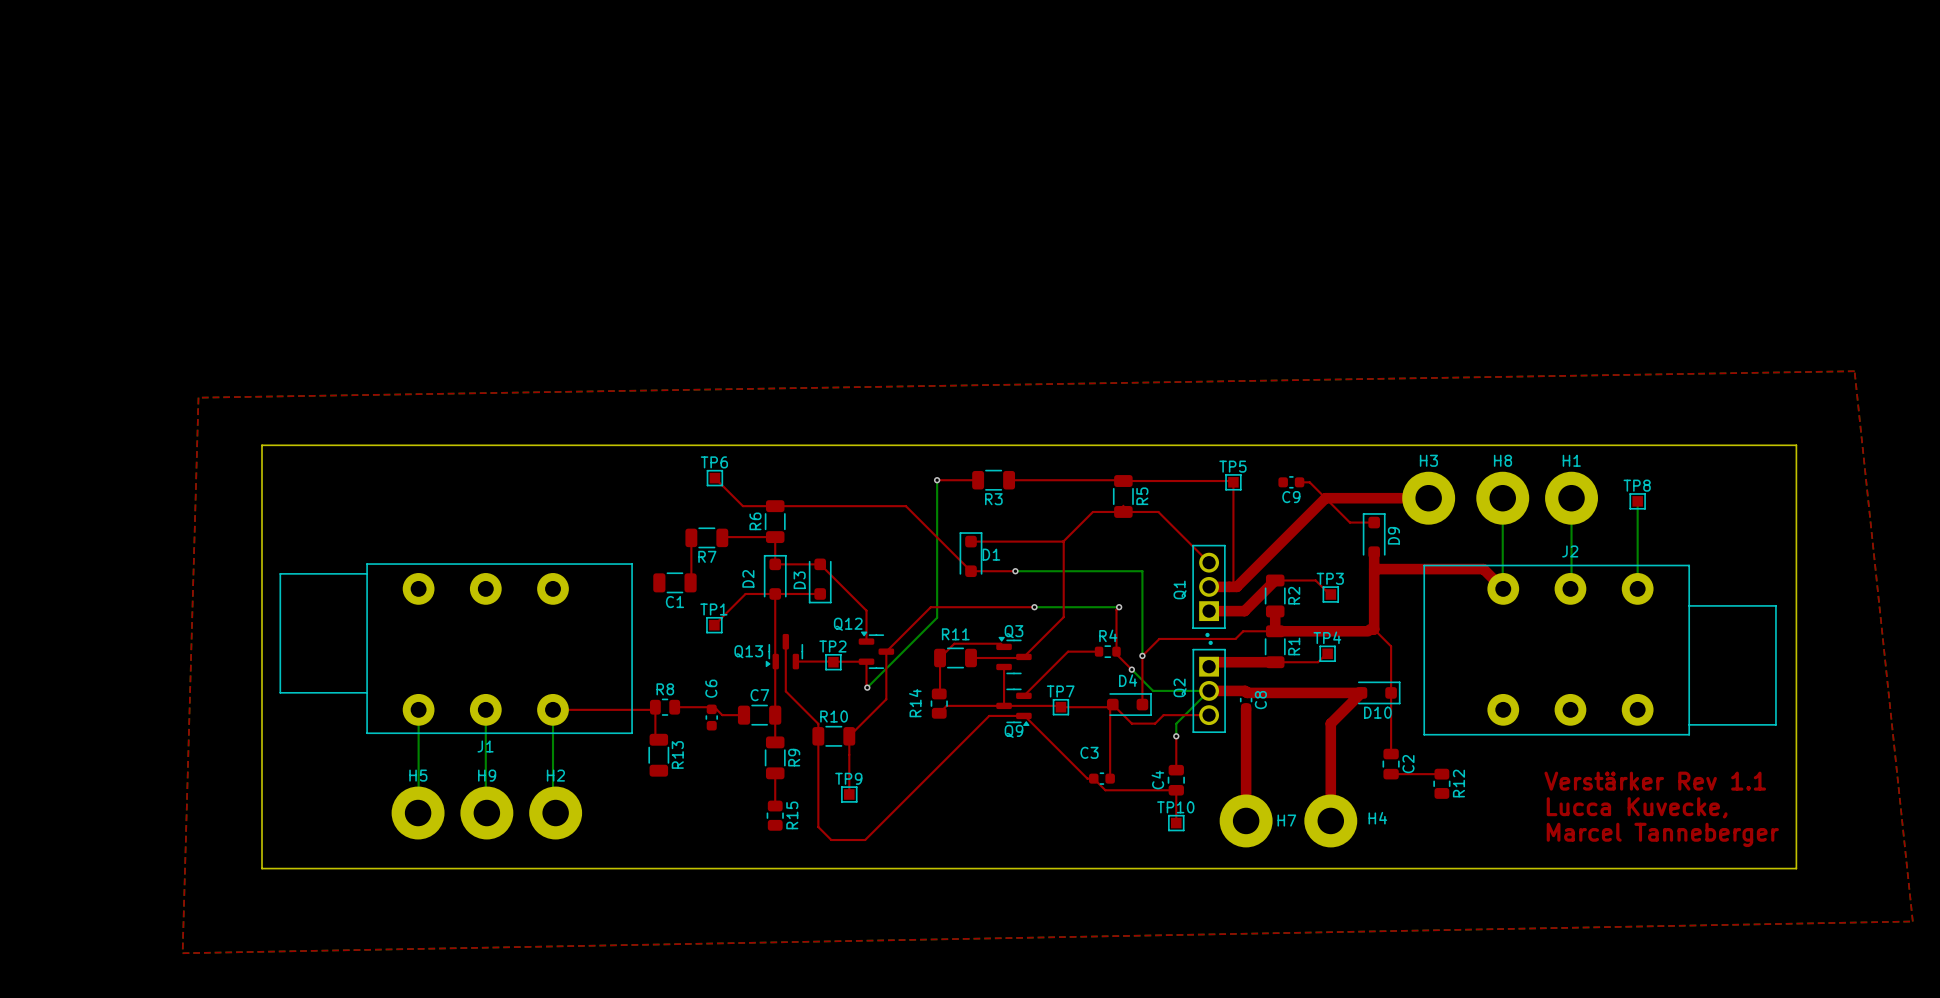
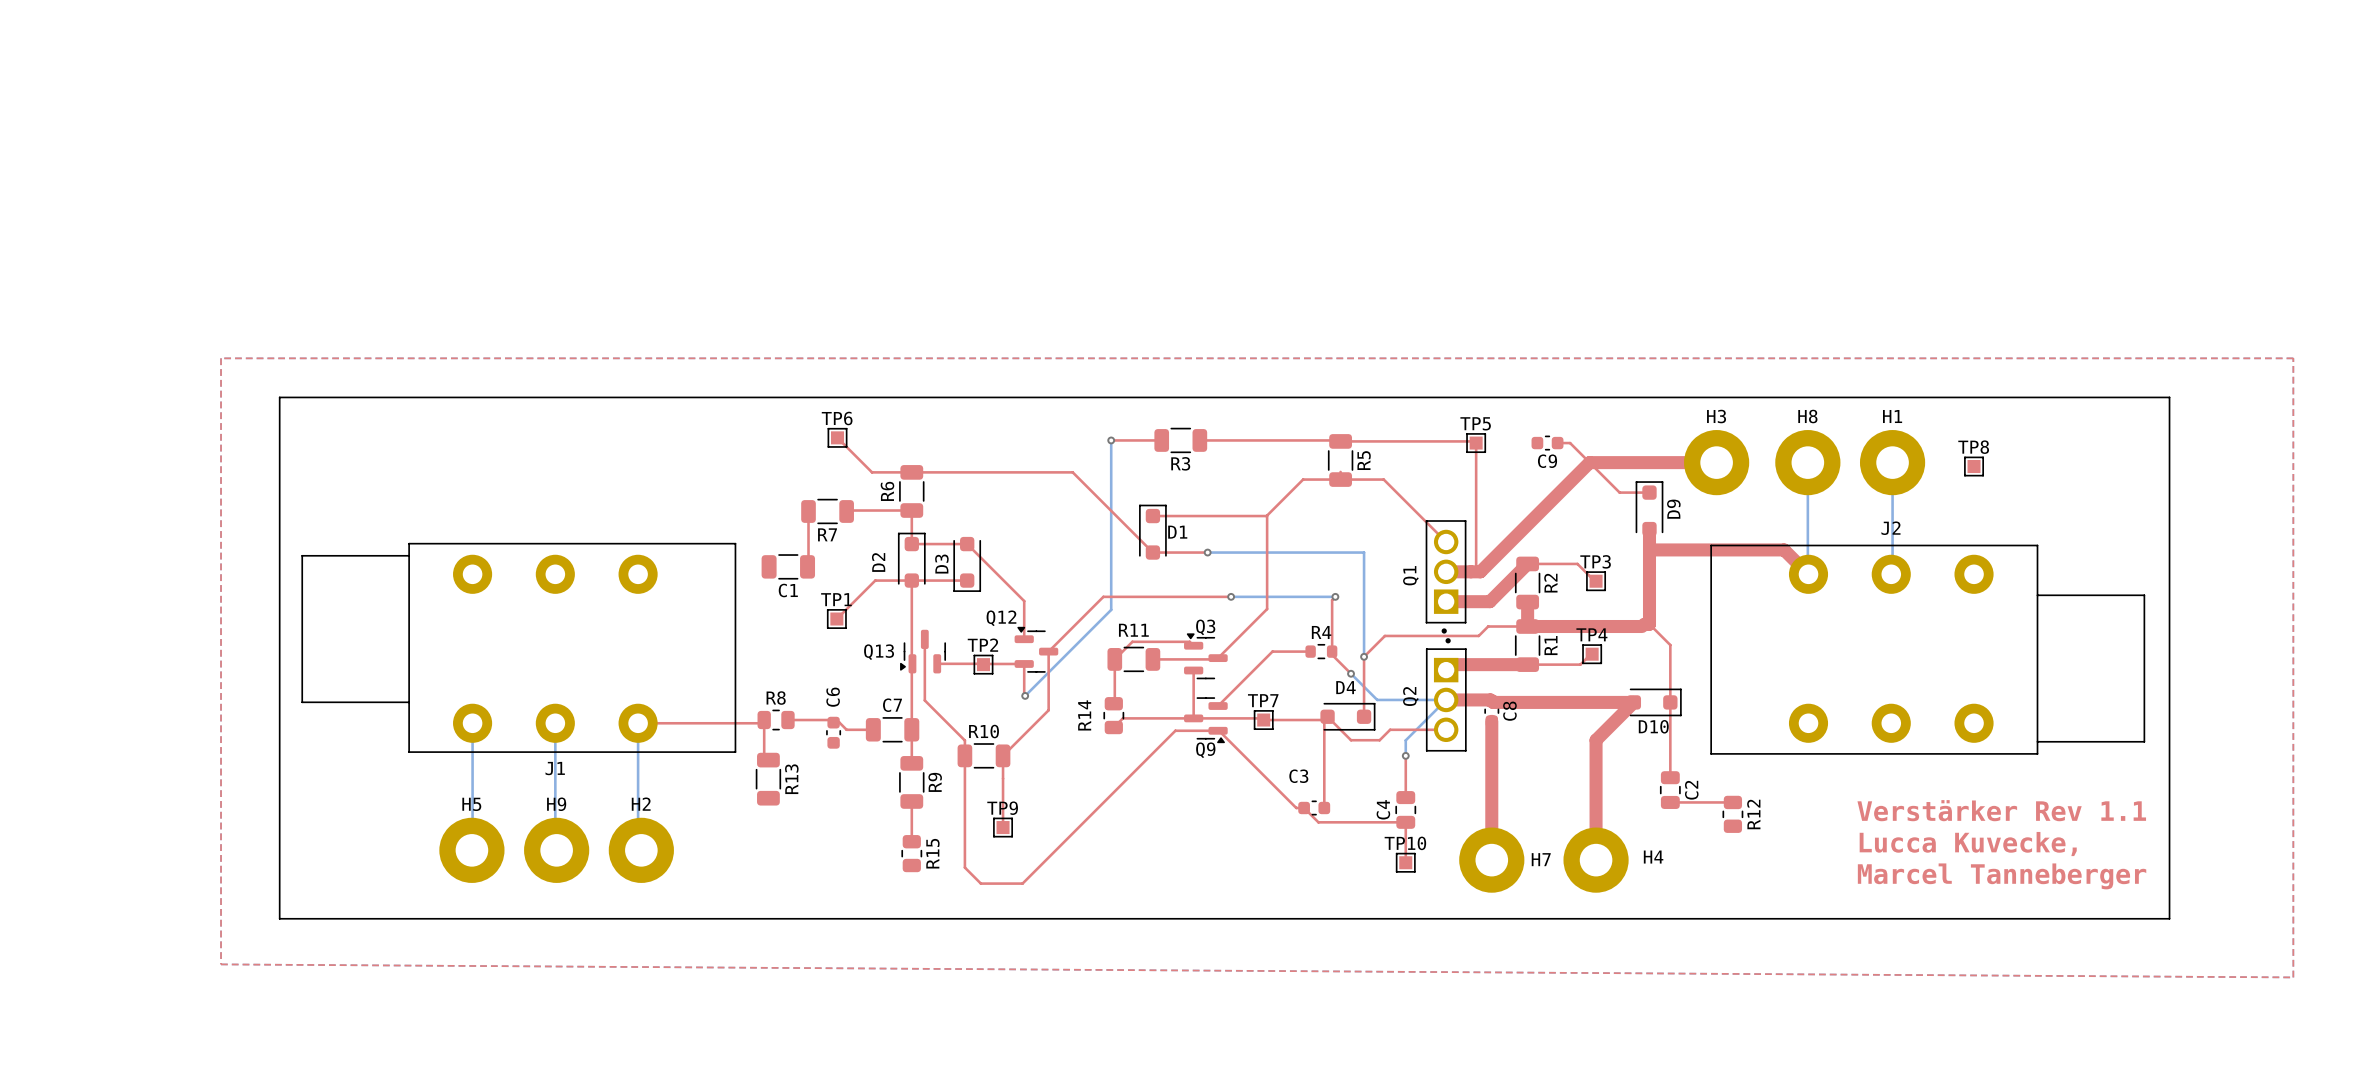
top zone outline: (1854, 371) (1912, 921) (182, 953) (198, 397) (1854, 371) -> (221, 358) (221, 964) (2293, 977) (2293, 358) (221, 358)
bottom track: (1637, 501) (1637, 588) -> none

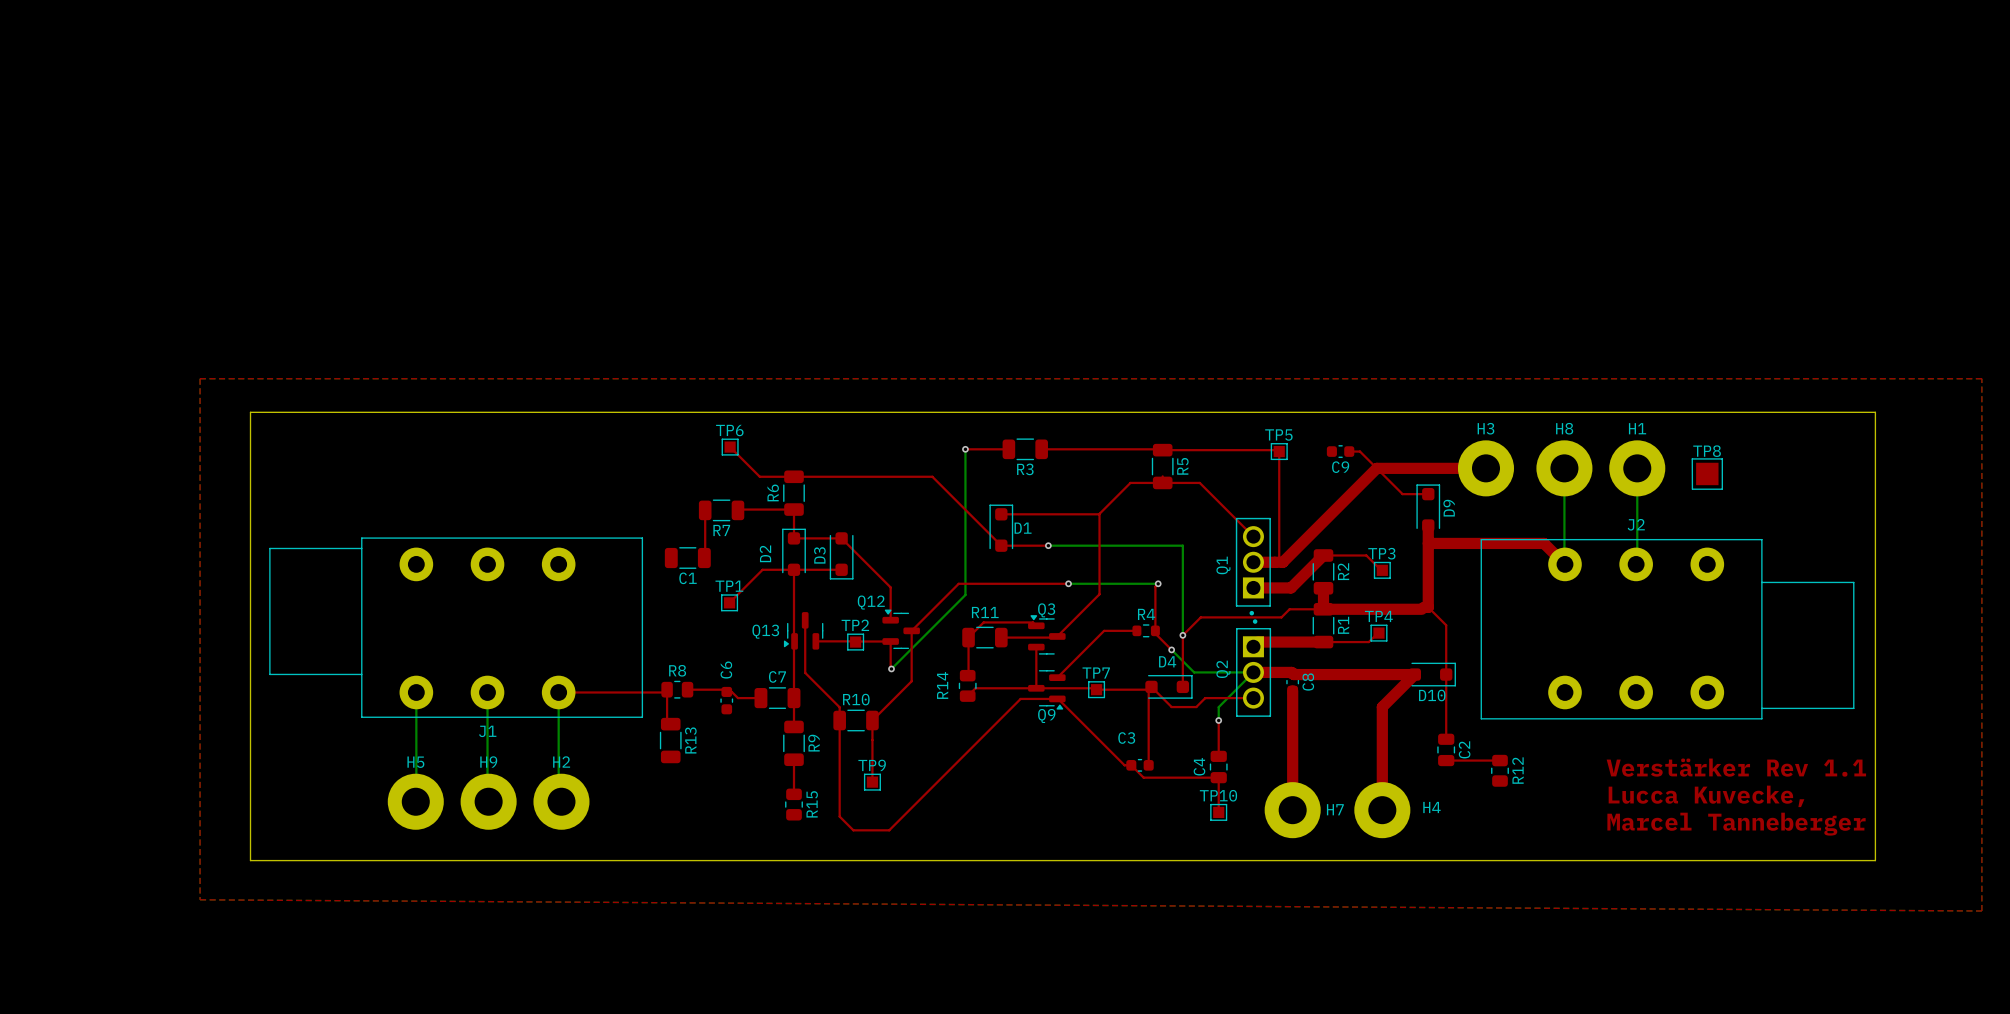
TP8 footprint: [1964, 456, 1984, 477] -> [1691, 458, 1724, 490]

